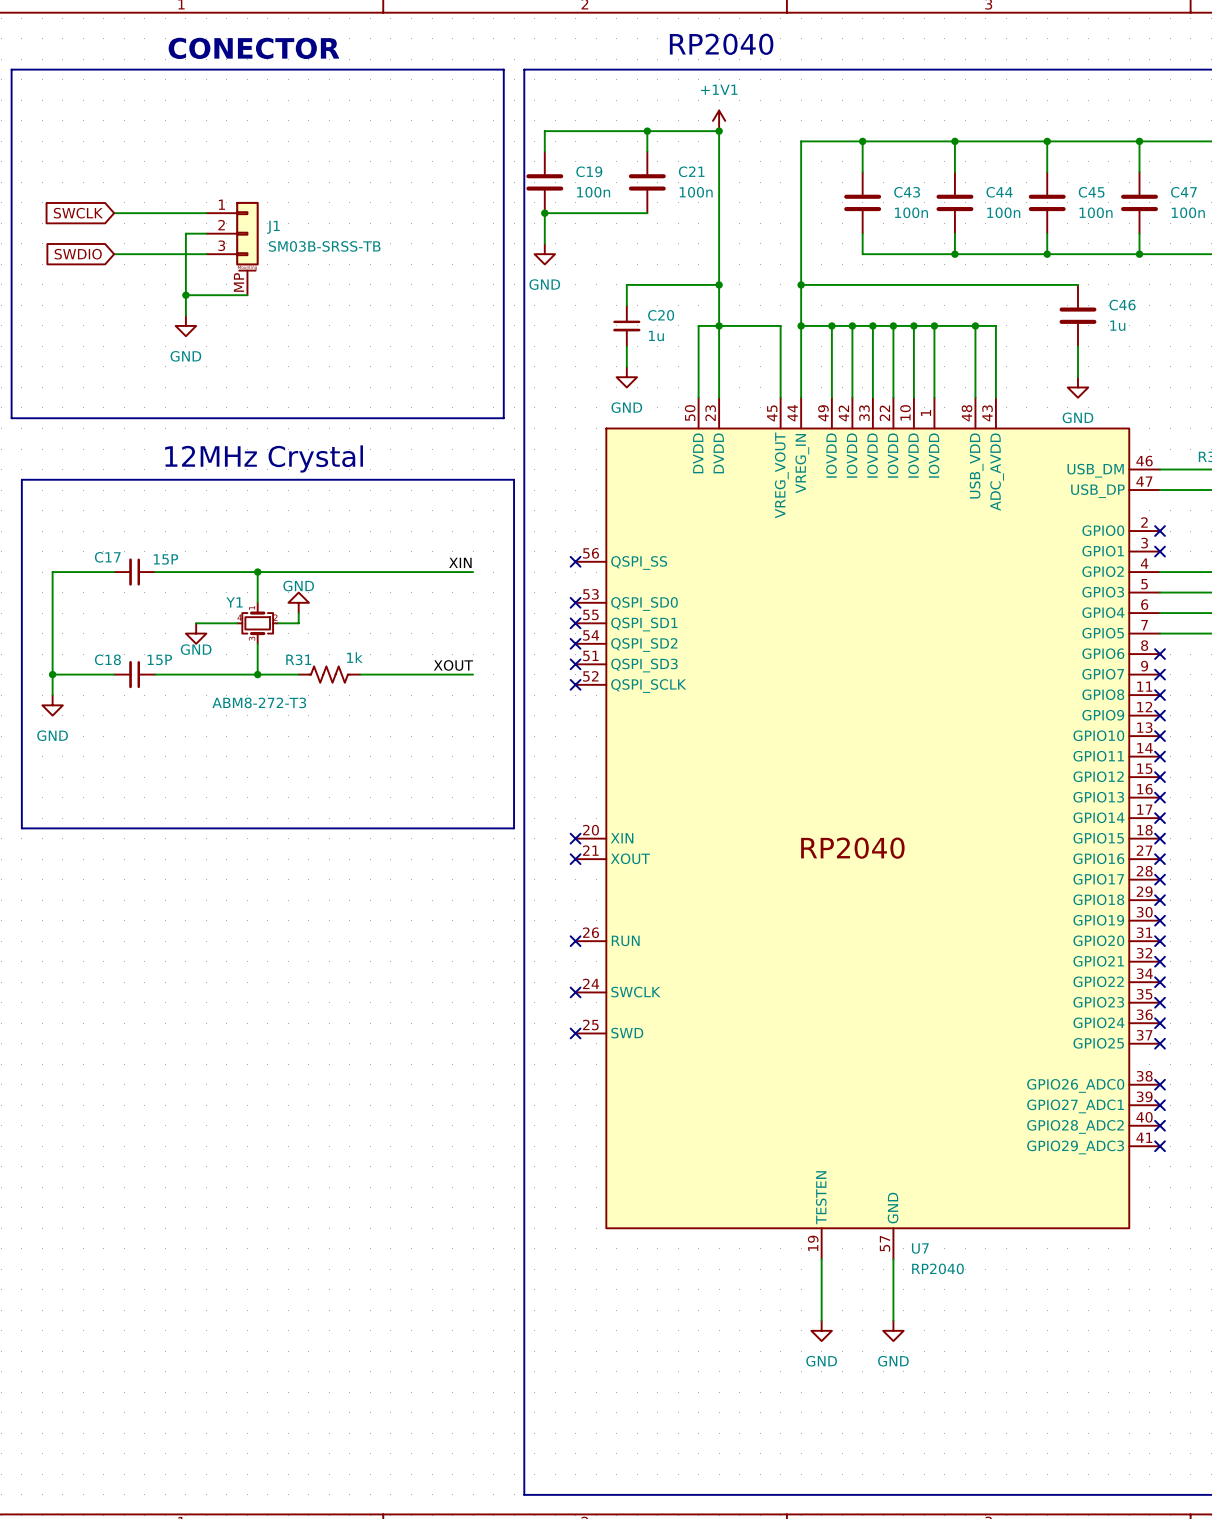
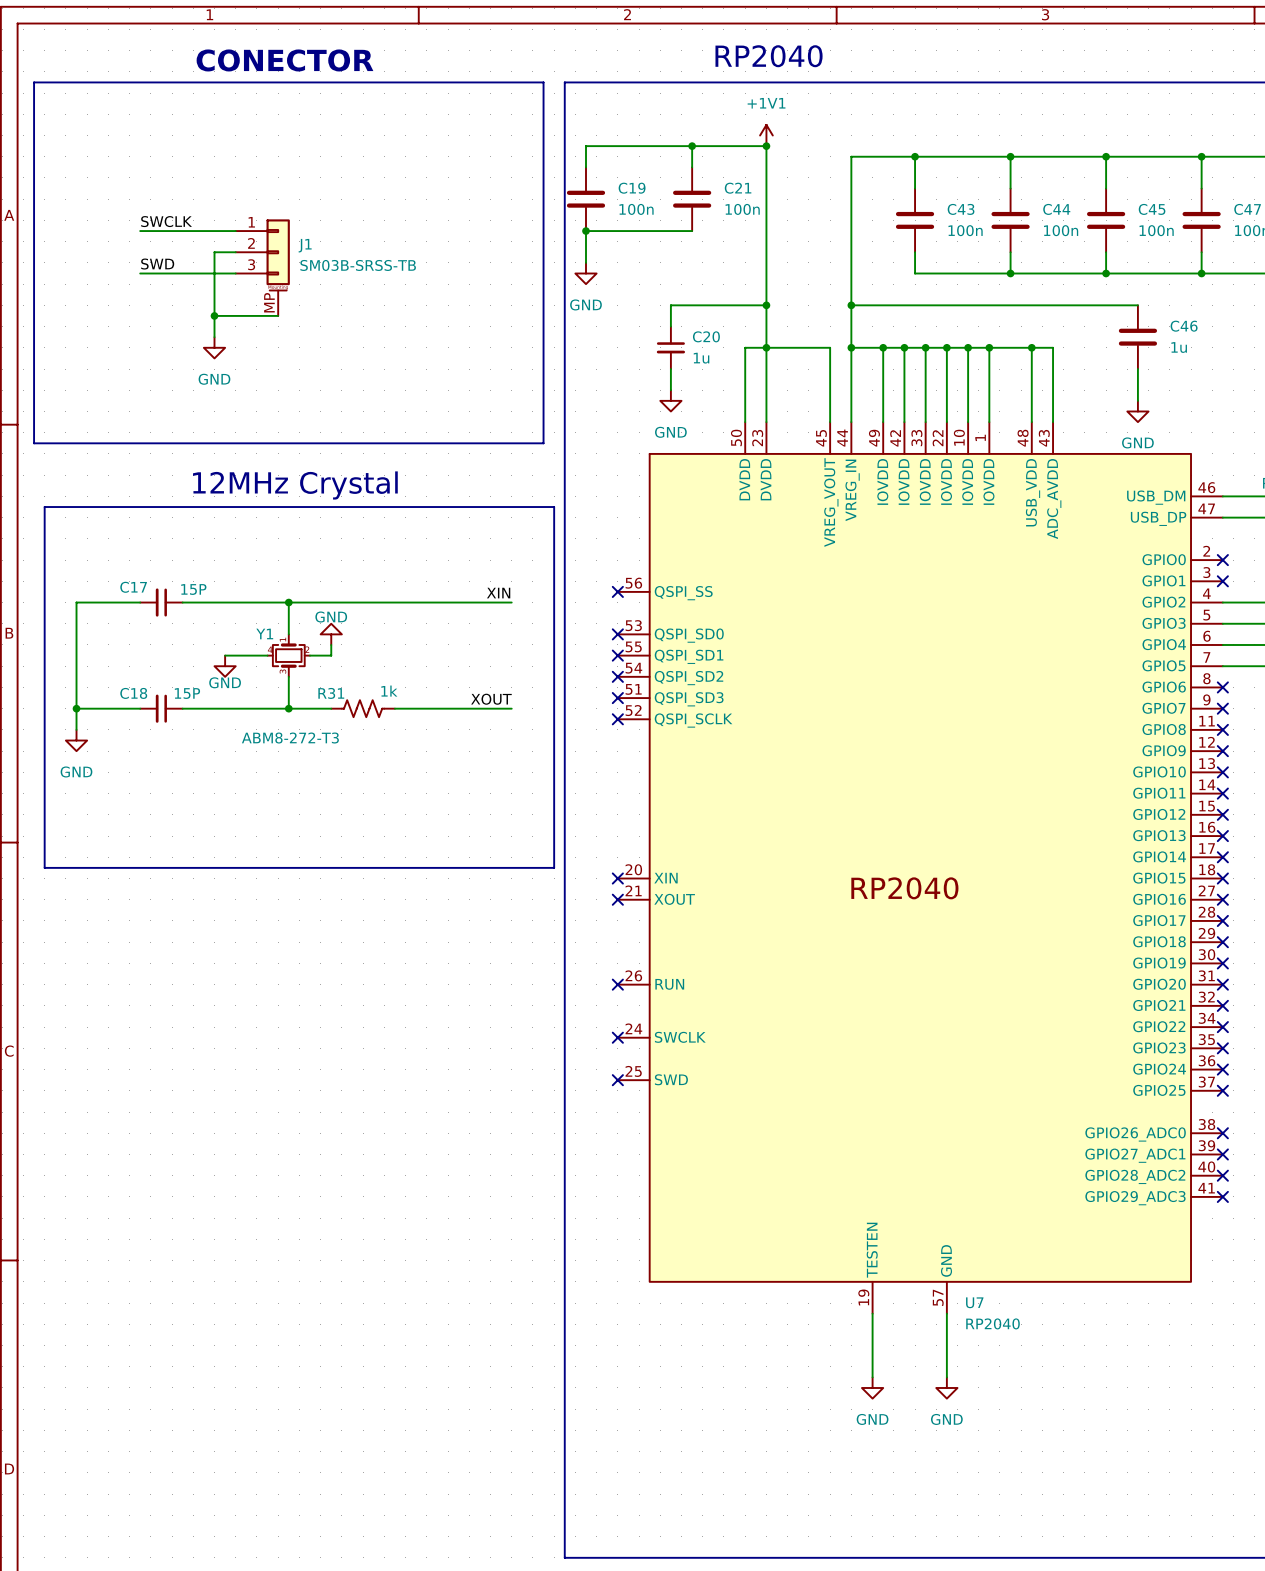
label: none -> SWCLK (166, 221)
global label: SWCLK (78, 213) -> none
label: none -> SWD (157, 264)
global label: SWDIO (78, 254) -> none

